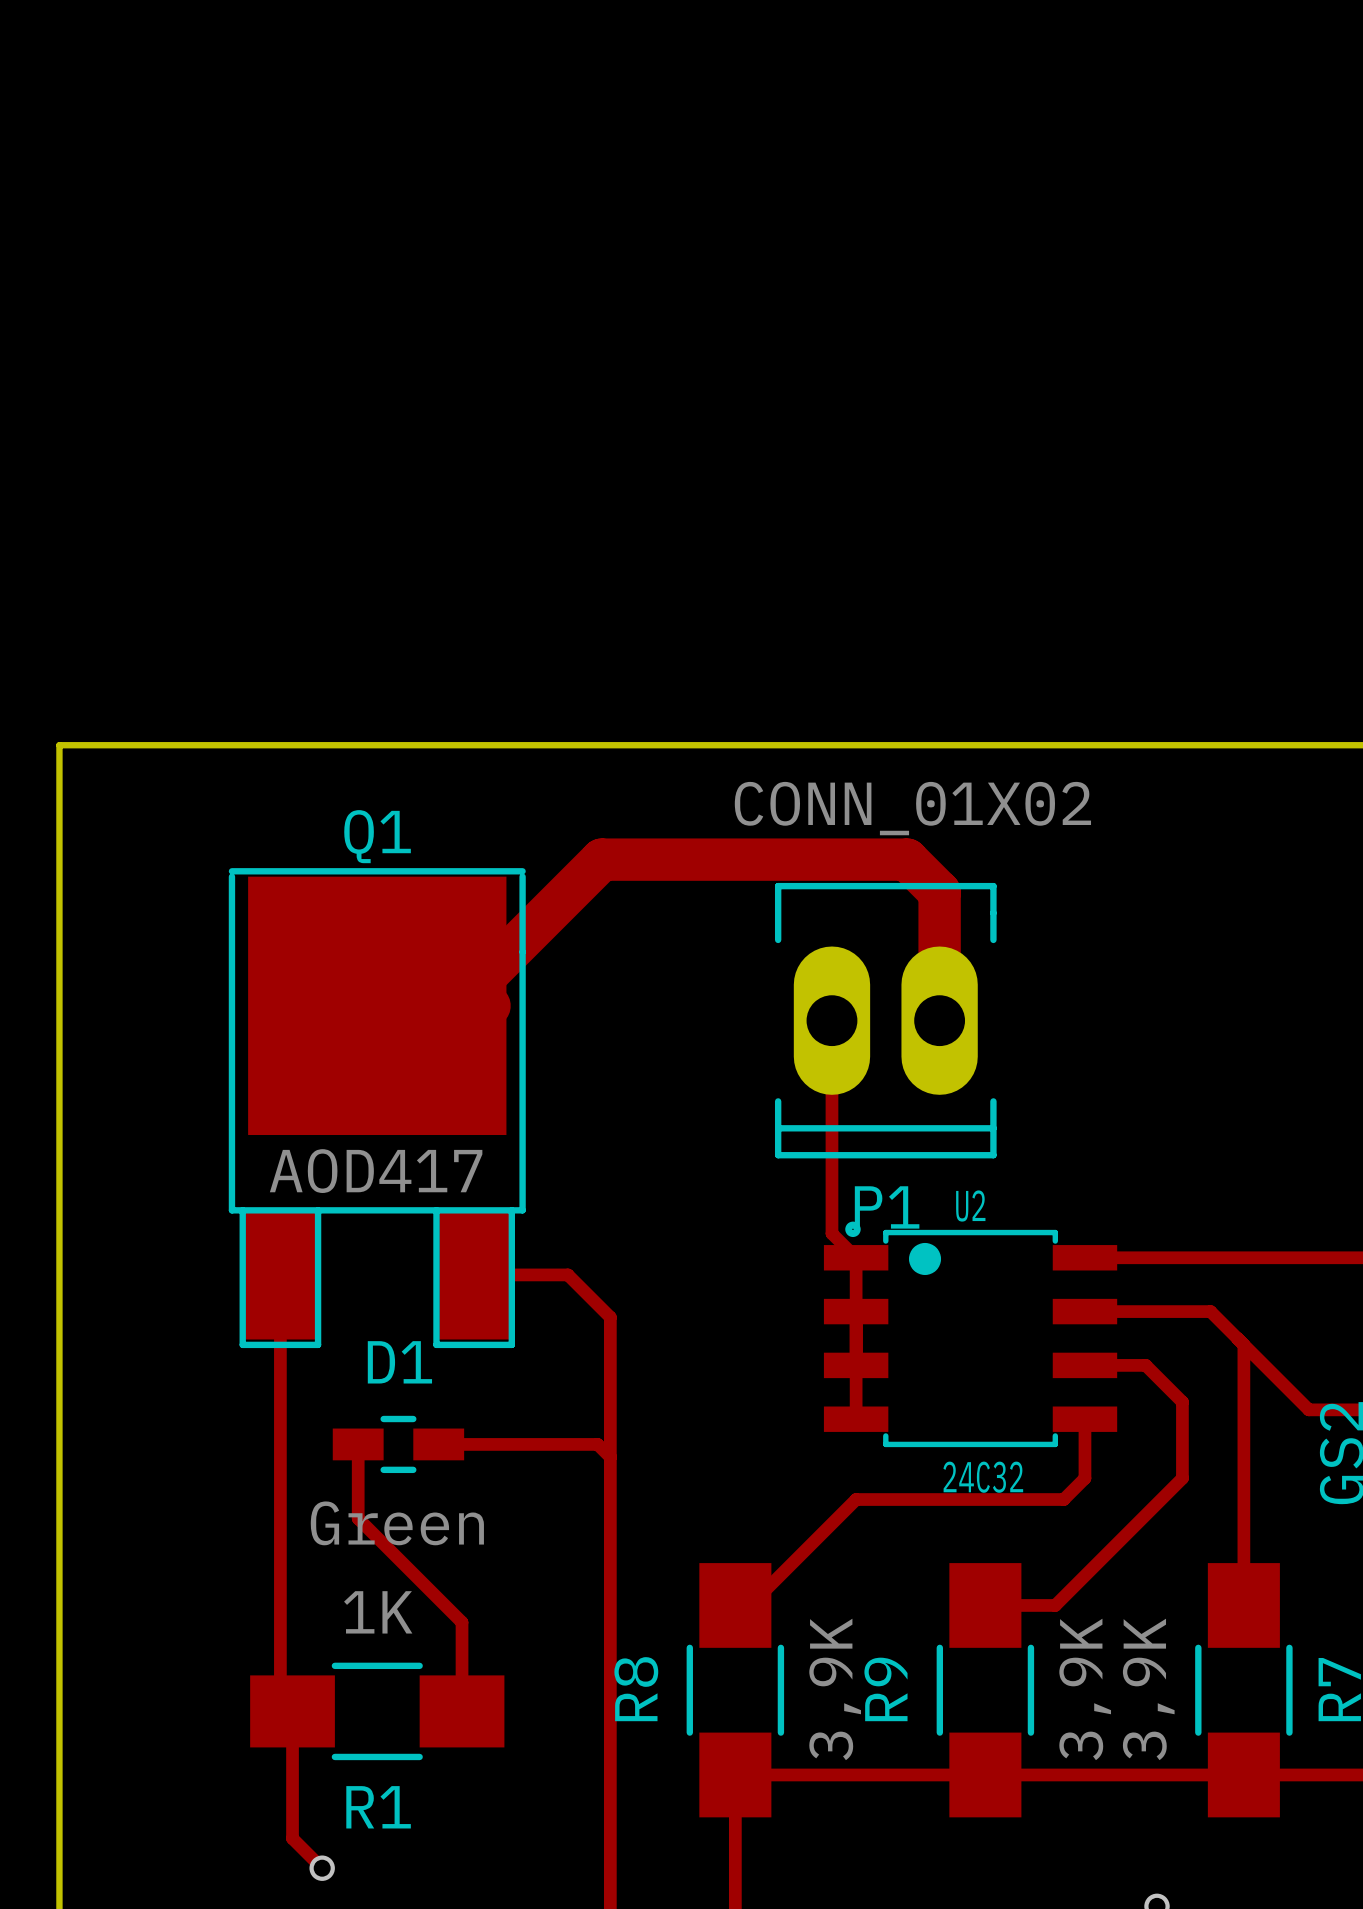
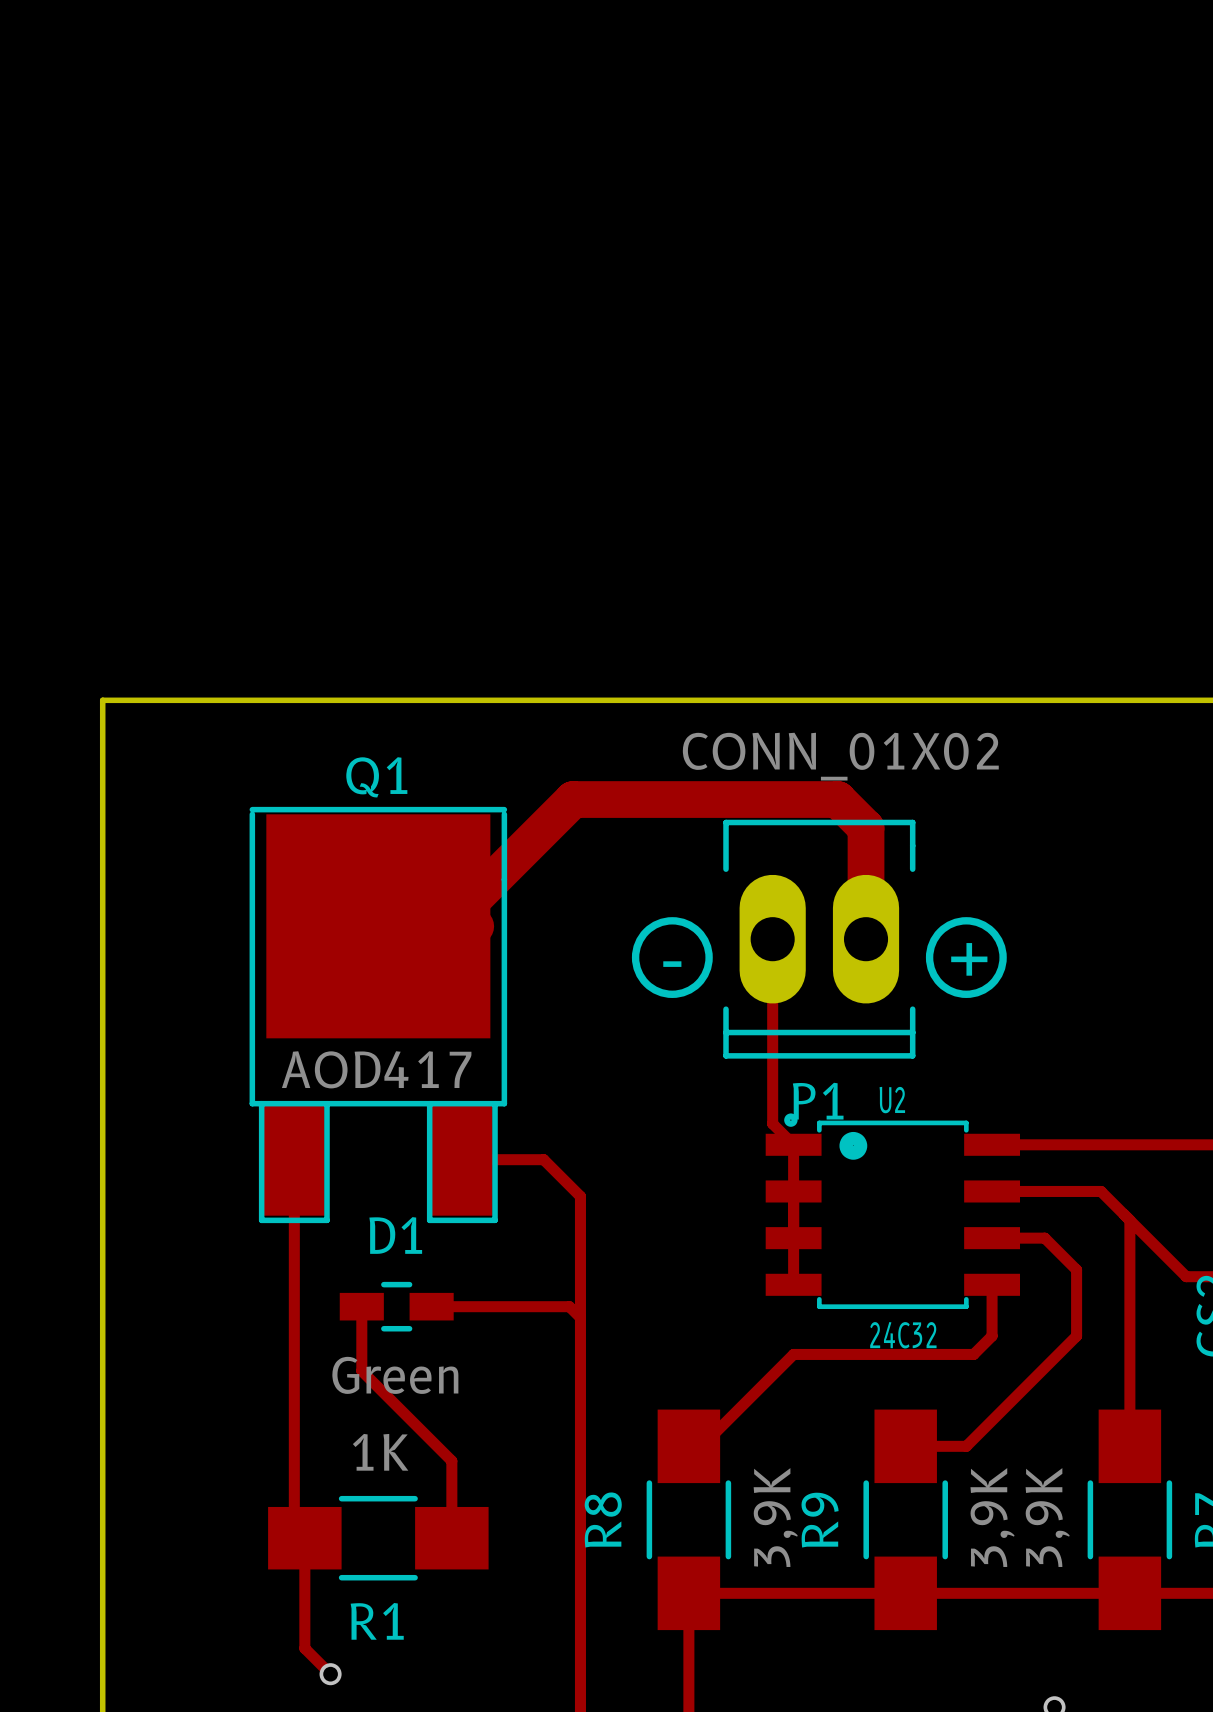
drawing: none -> [631, 917, 713, 998]
drawing: none -> [925, 917, 1007, 998]
text: none -> + (969, 959)
text: none -> - (672, 964)

